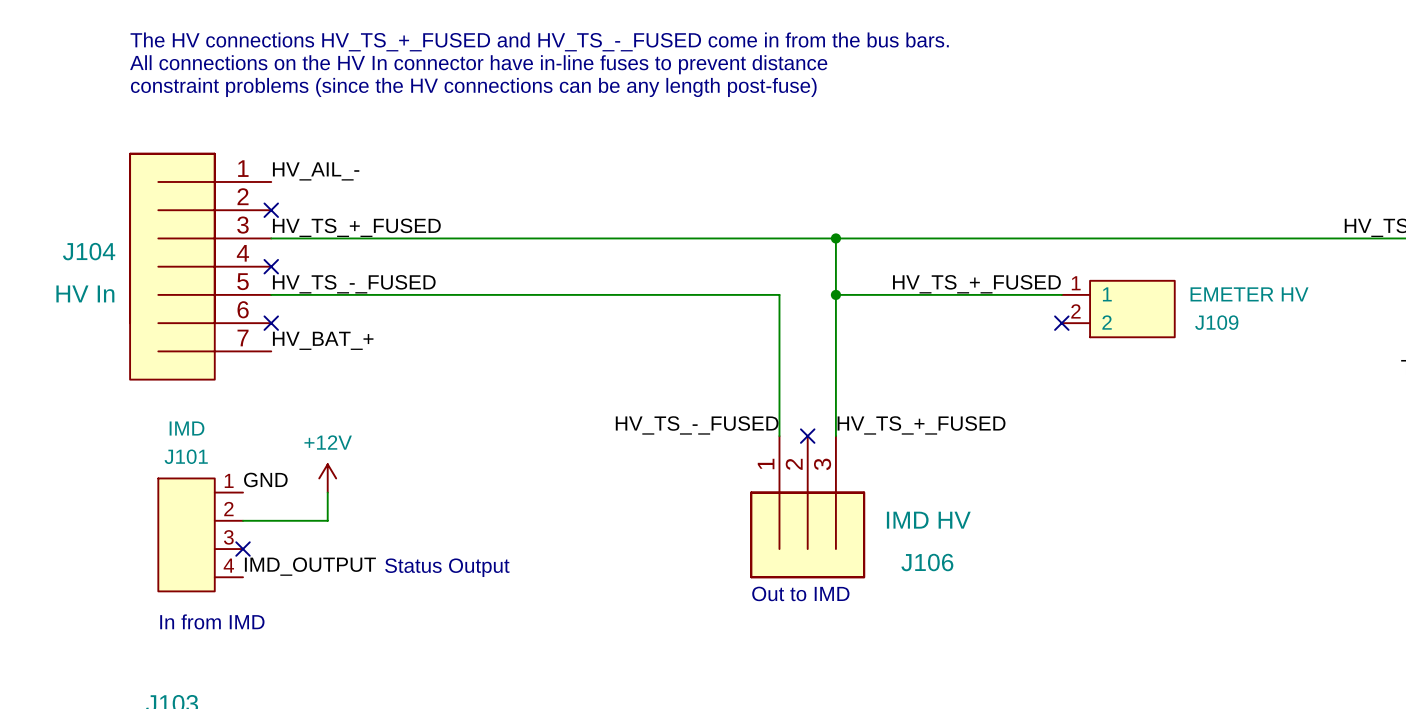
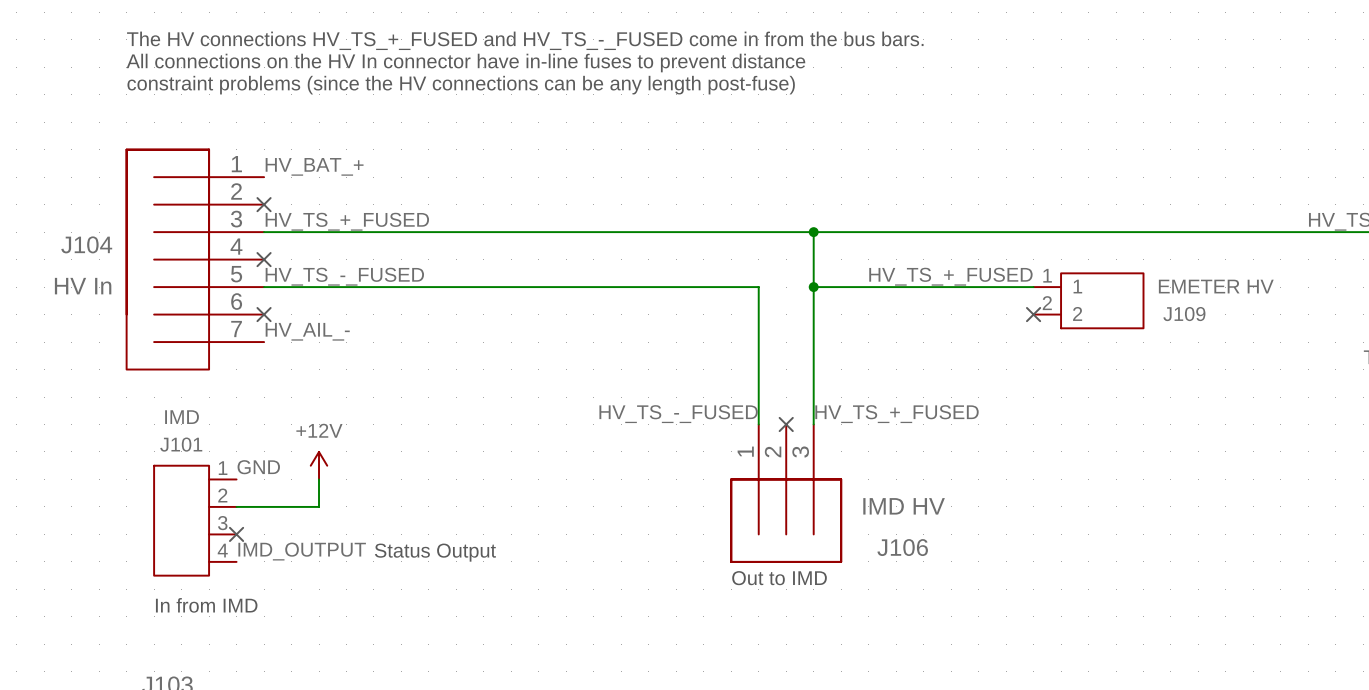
label: HV_AIL_- (316, 171) -> HV_BAT_+ (314, 166)
label: HV_BAT_+ (323, 340) -> HV_AIL_- (307, 331)

